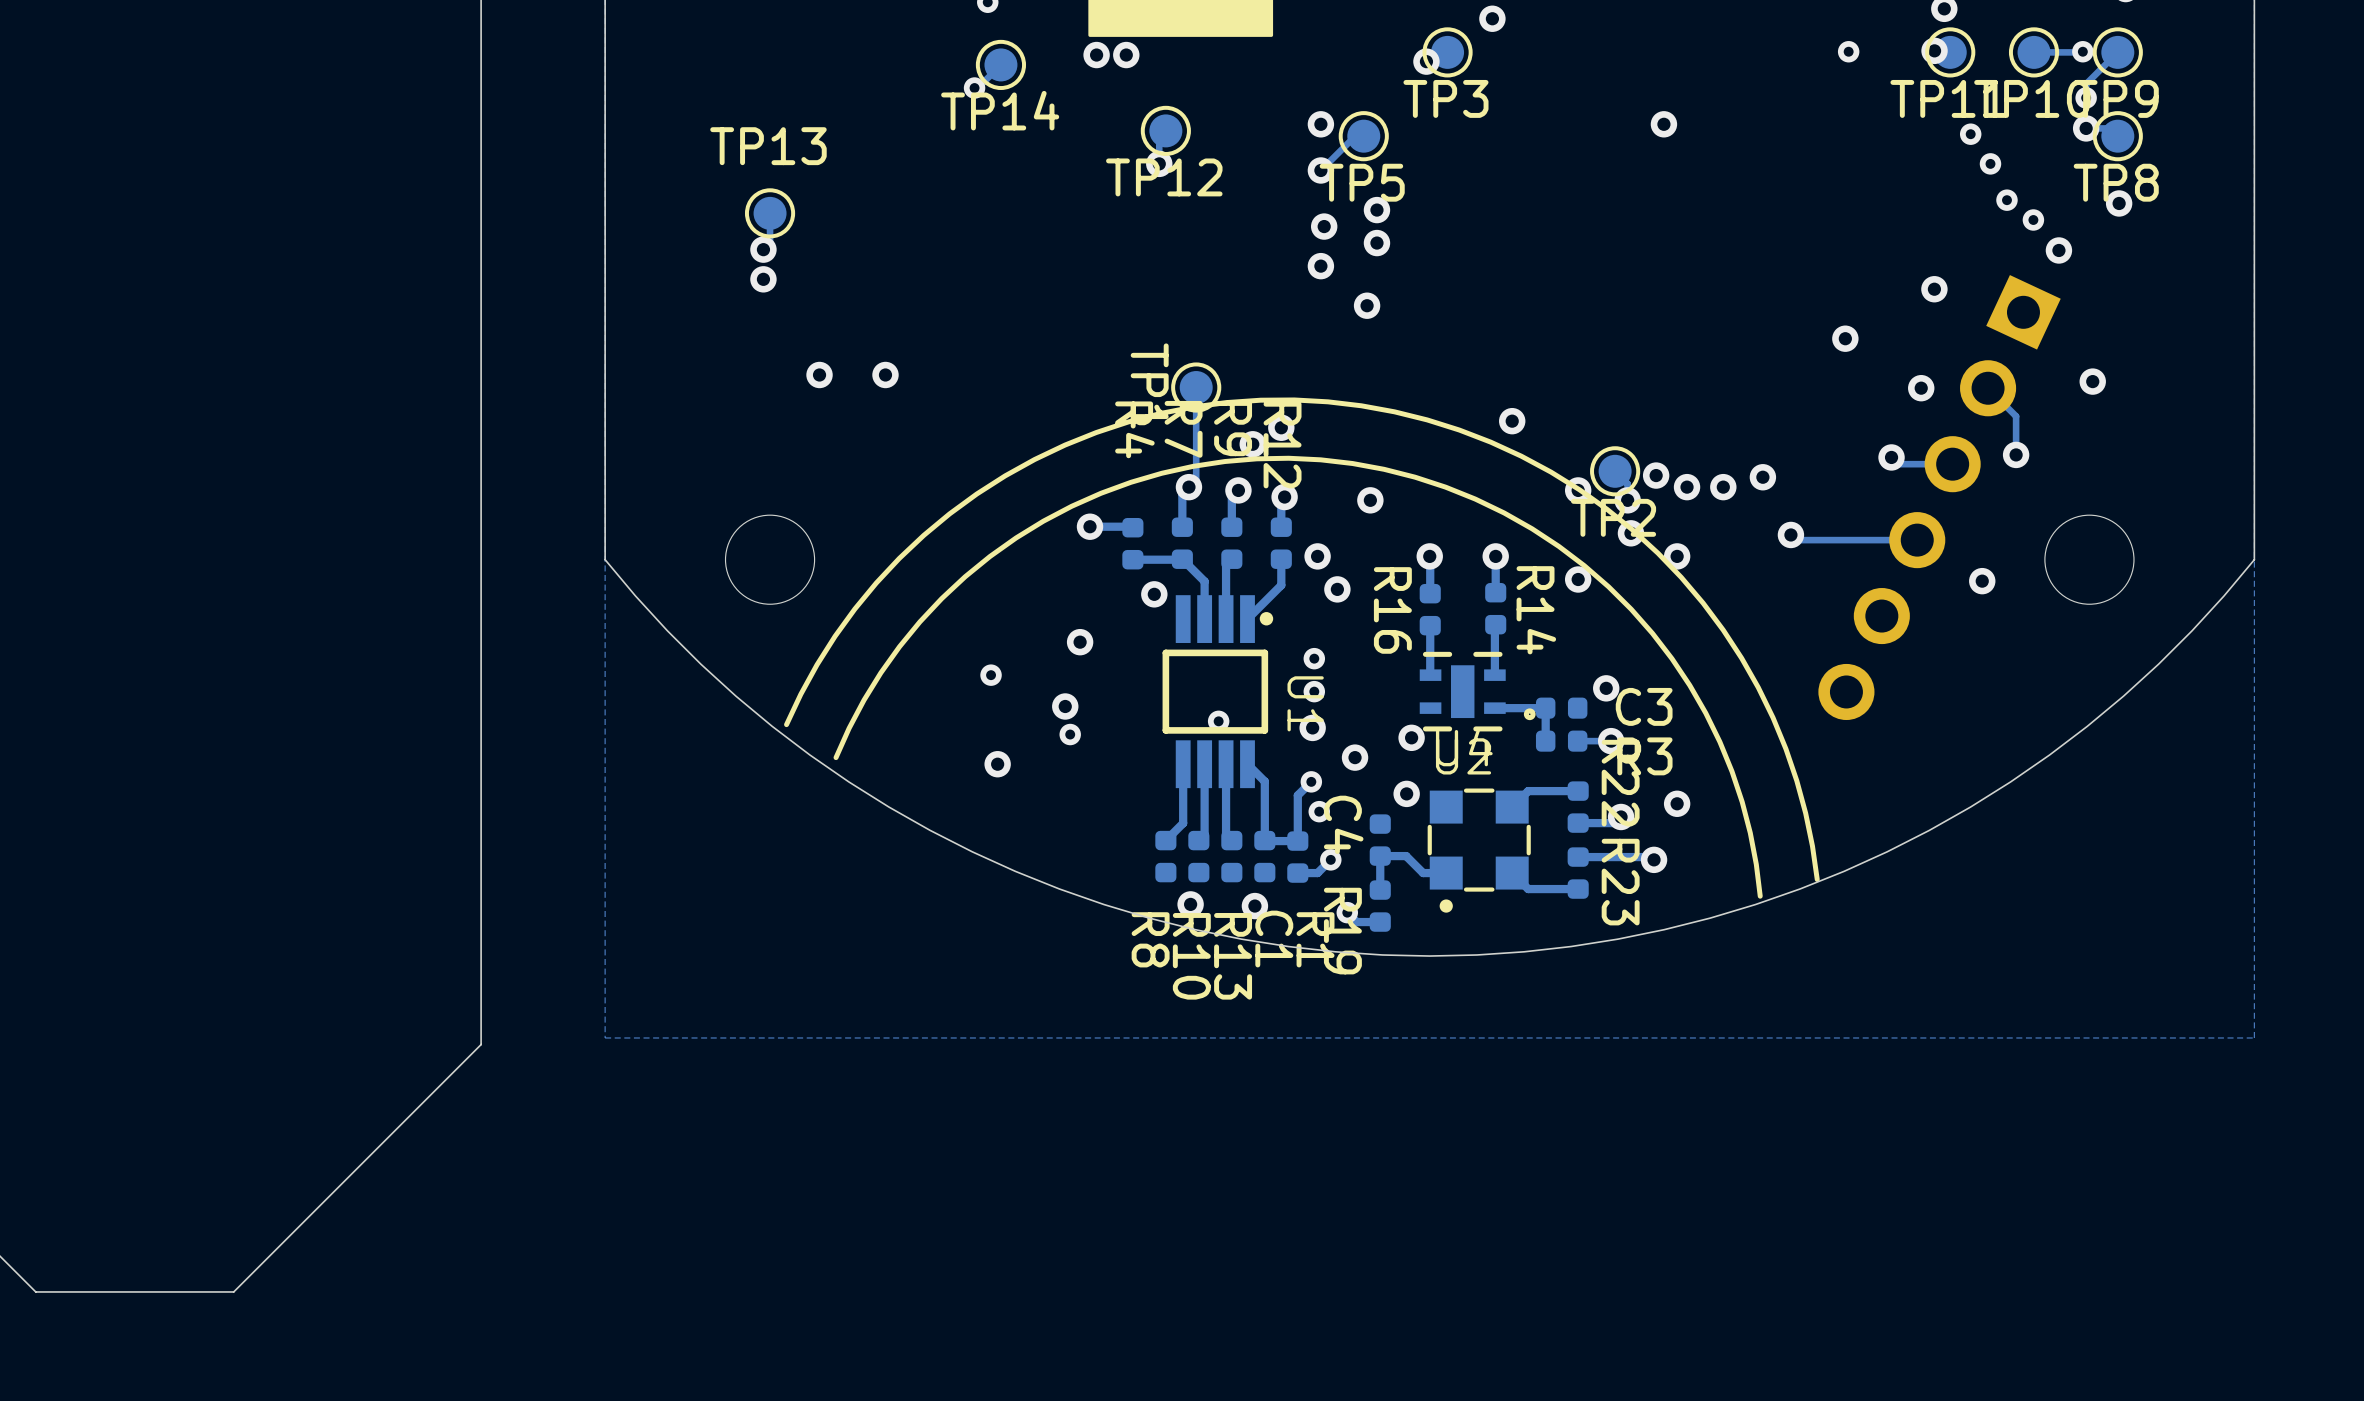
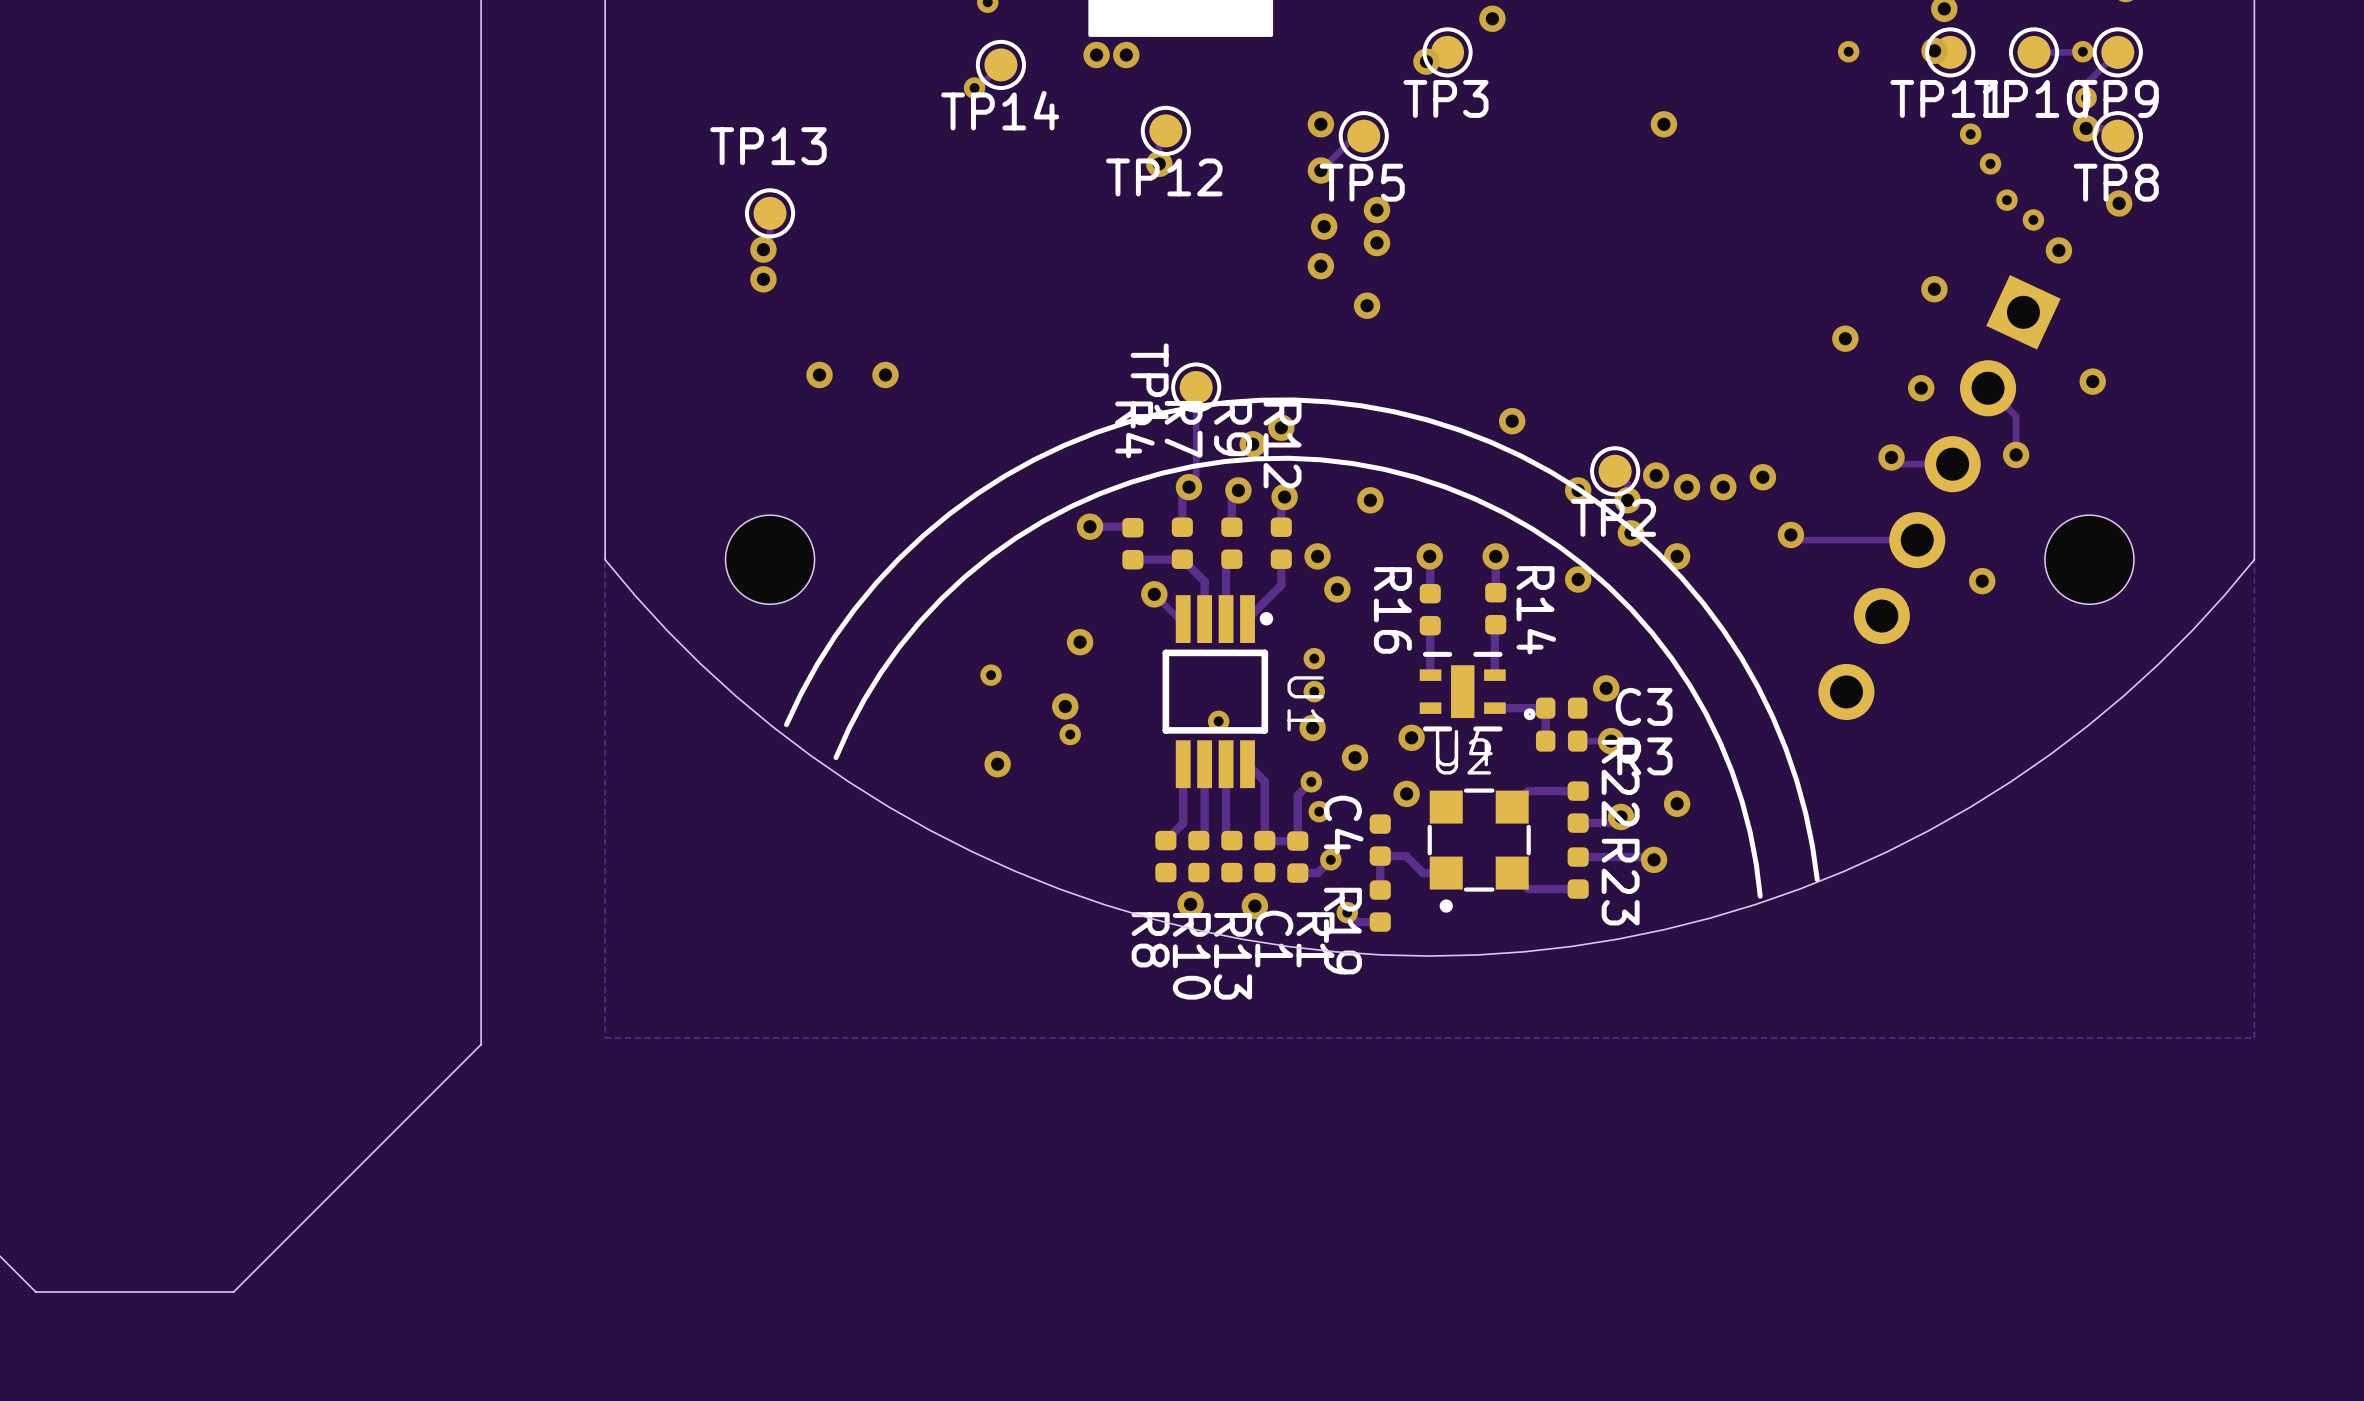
track: none -> (1154, 594) (1179, 619) (1183, 619)

